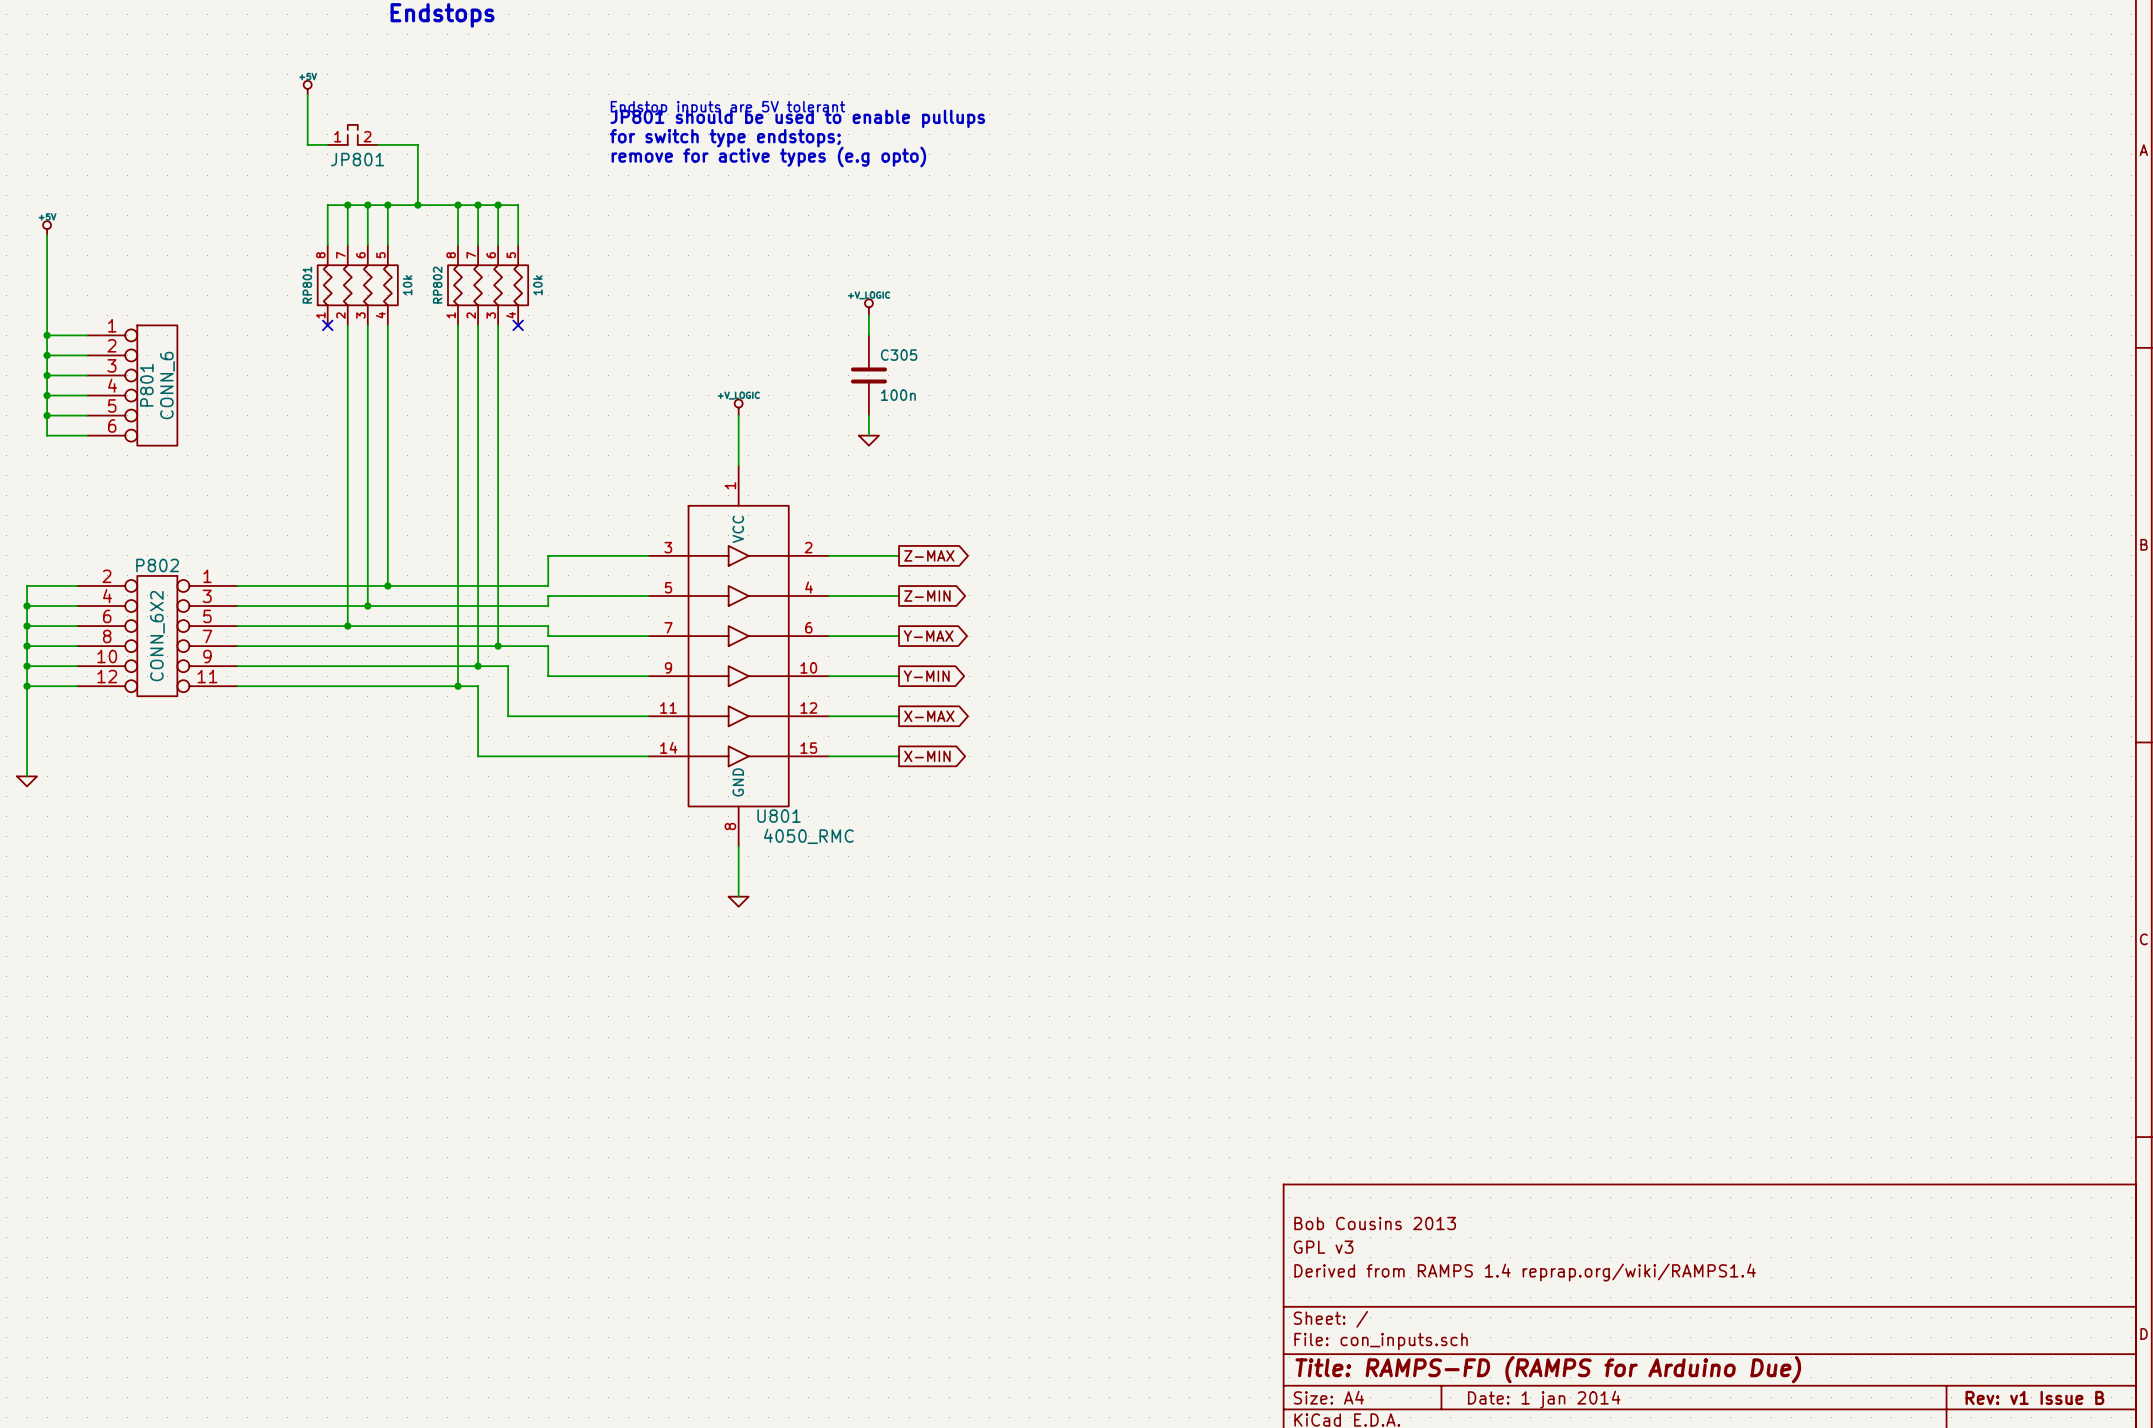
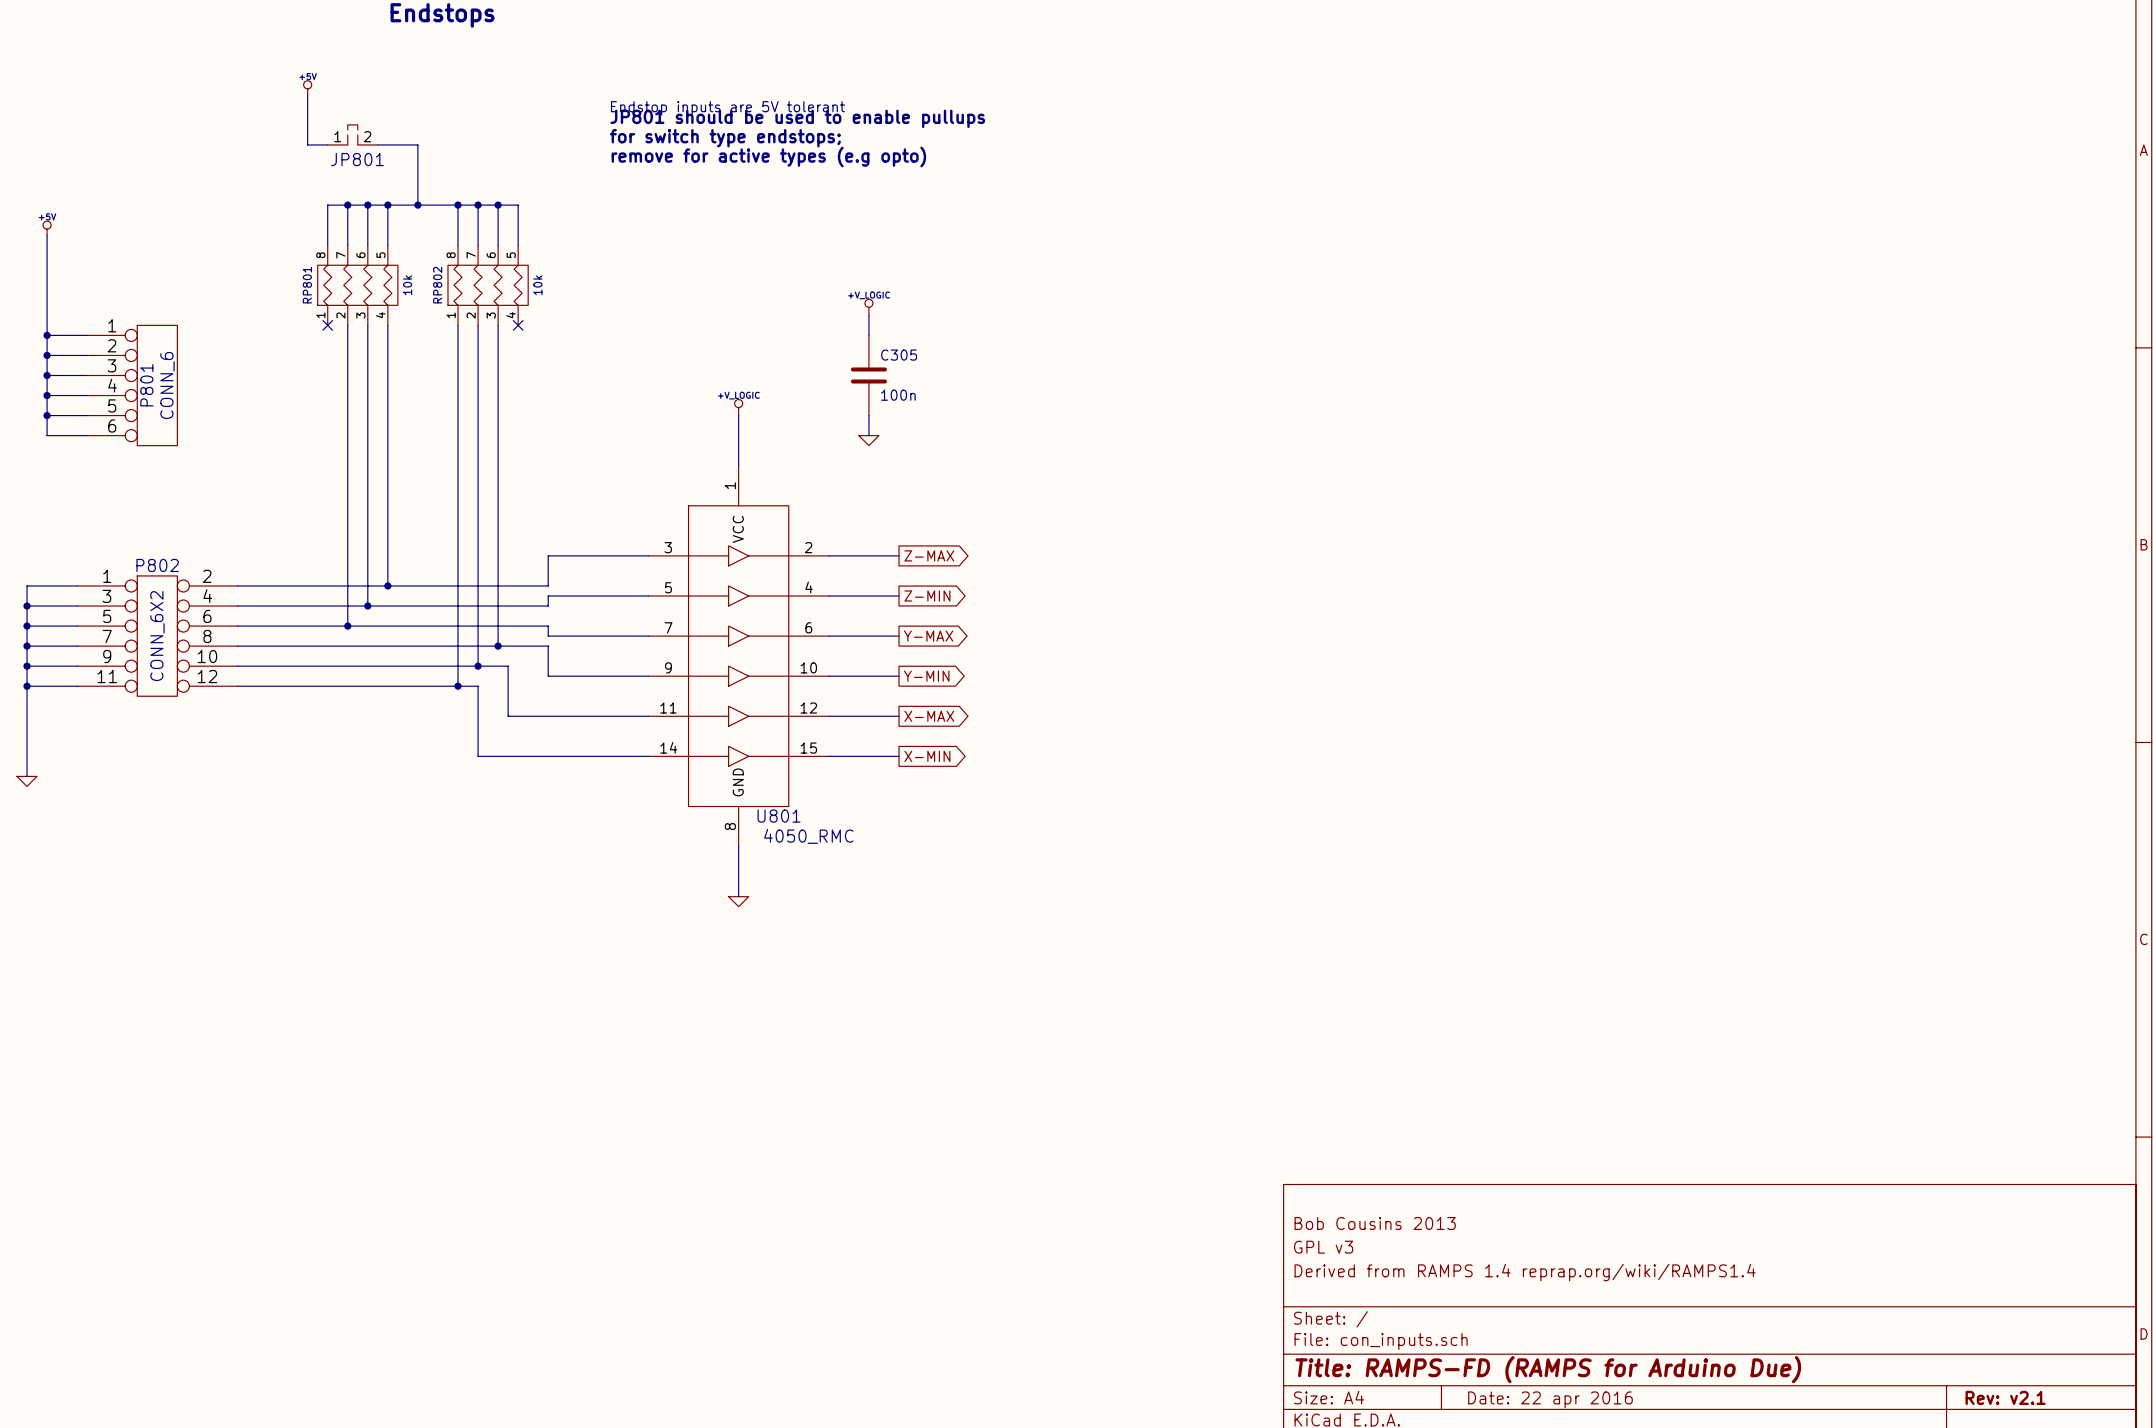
P802 flip: as is (157, 636) -> left-right (157, 636)
title block: Rev: v1 Issue B (2034, 1397) -> Rev: v2.1 (2005, 1397)
title block: Date: 1 jan 2014 (1544, 1399) -> Date: 22 apr 2016 (1550, 1399)

